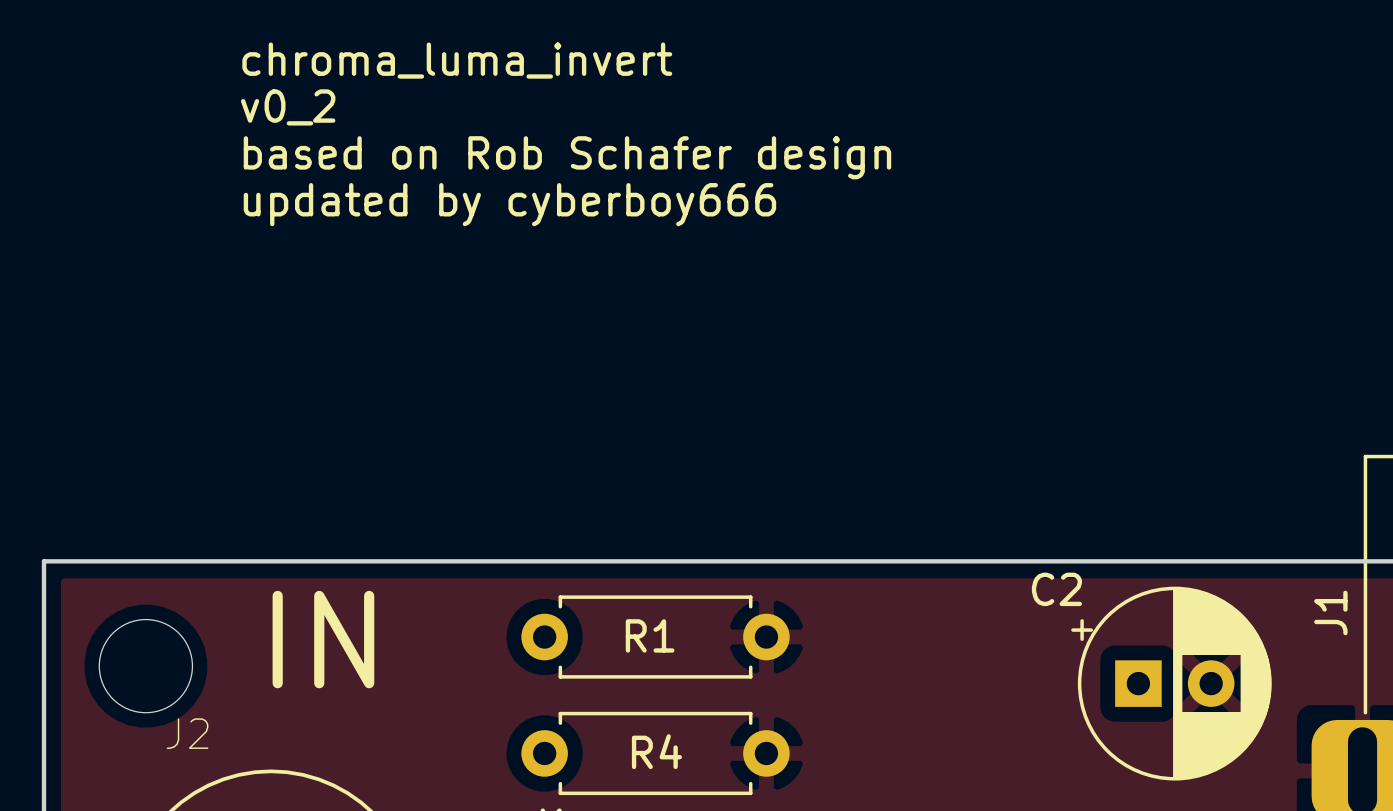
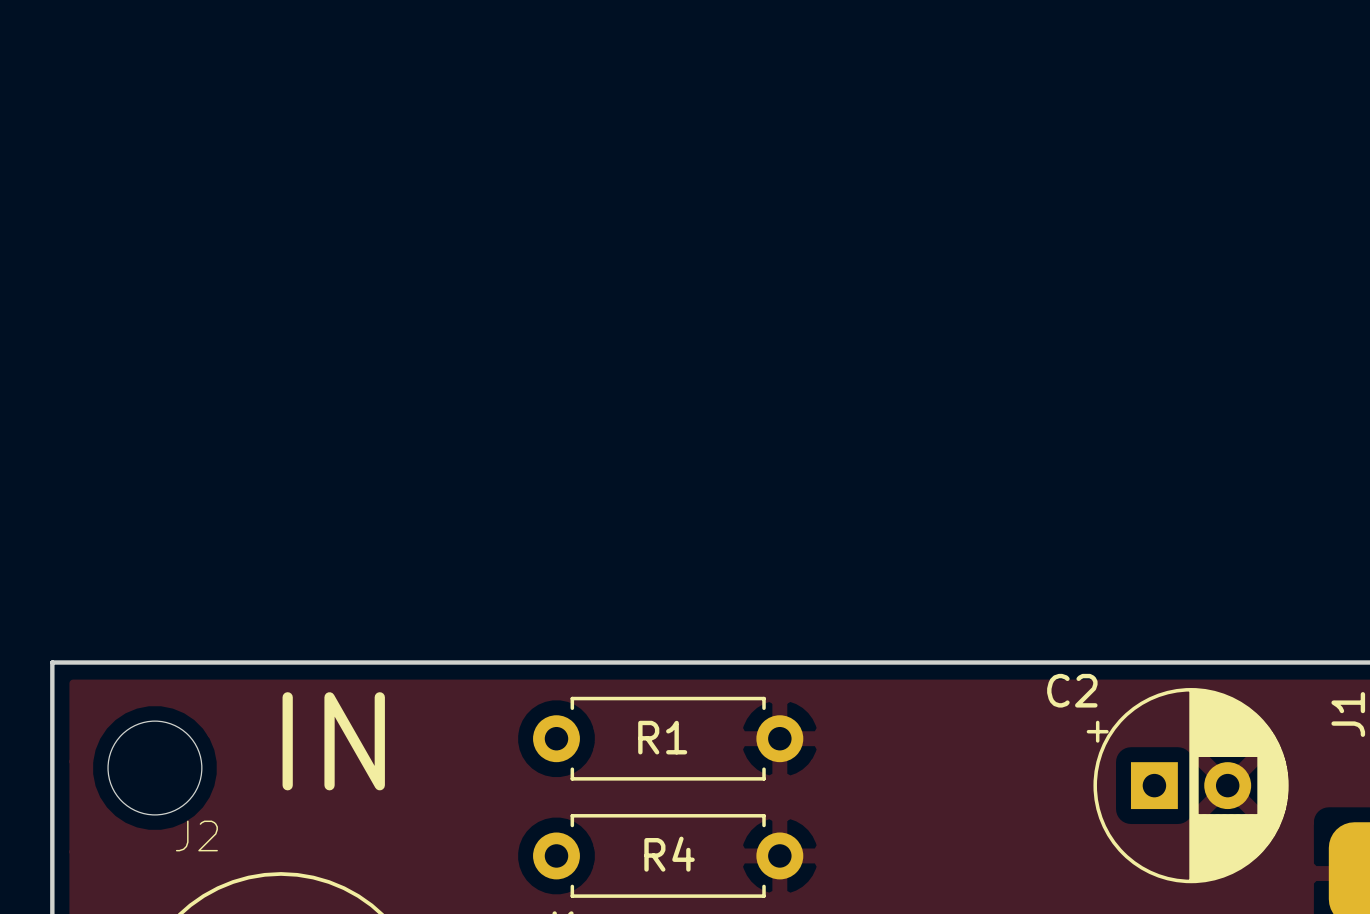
text: chroma_luma_invert (457, 60) -> none
text: v0_2 (288, 107) -> none
text: based on Rob Schafer design (567, 157) -> none
text: updated by cyberboy666 (509, 204) -> none

